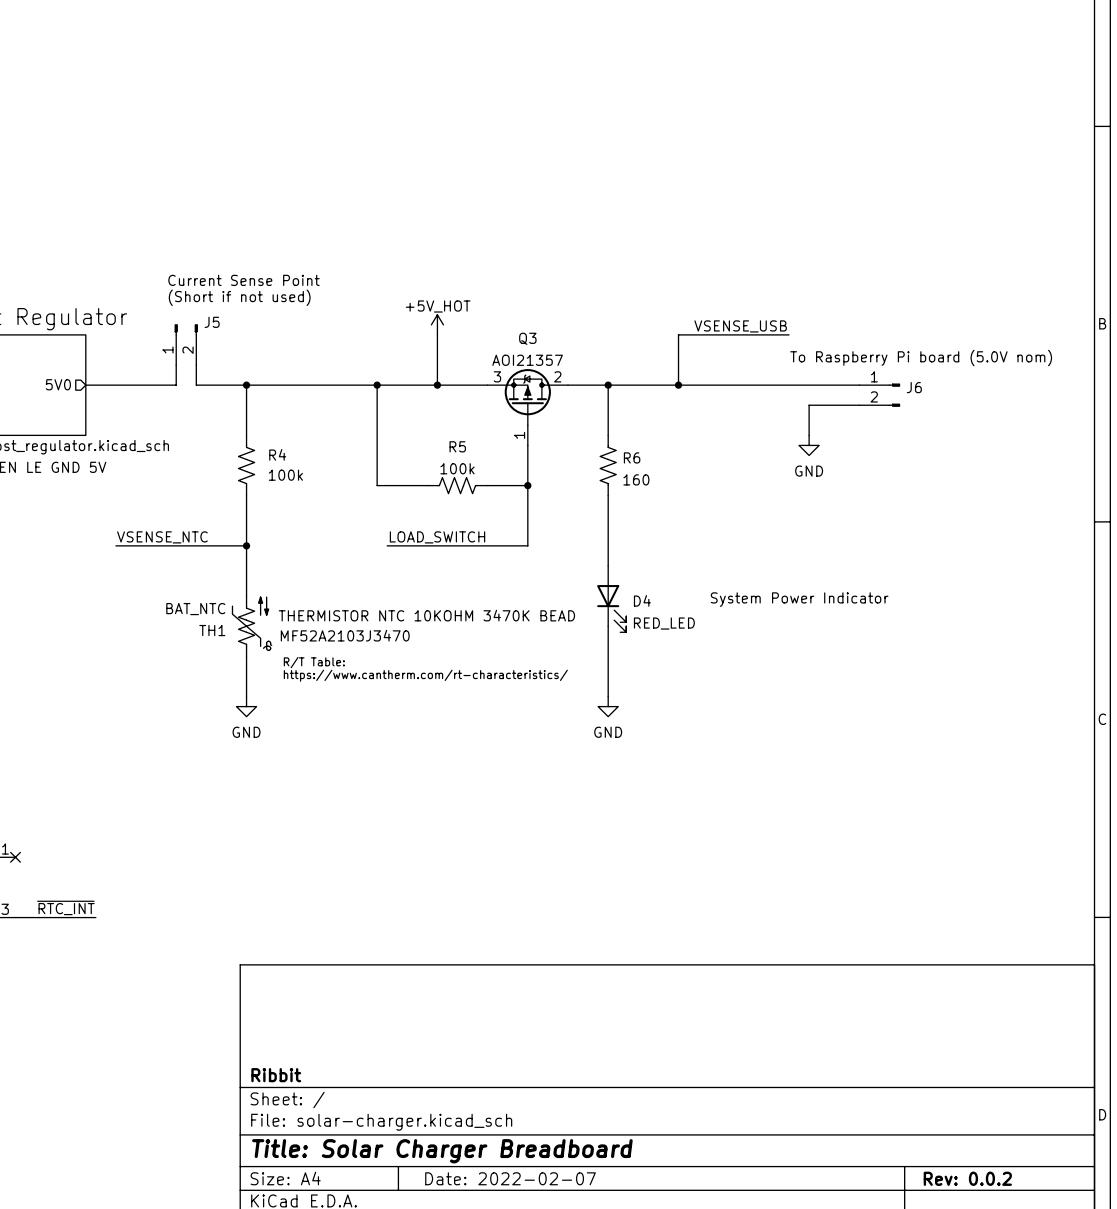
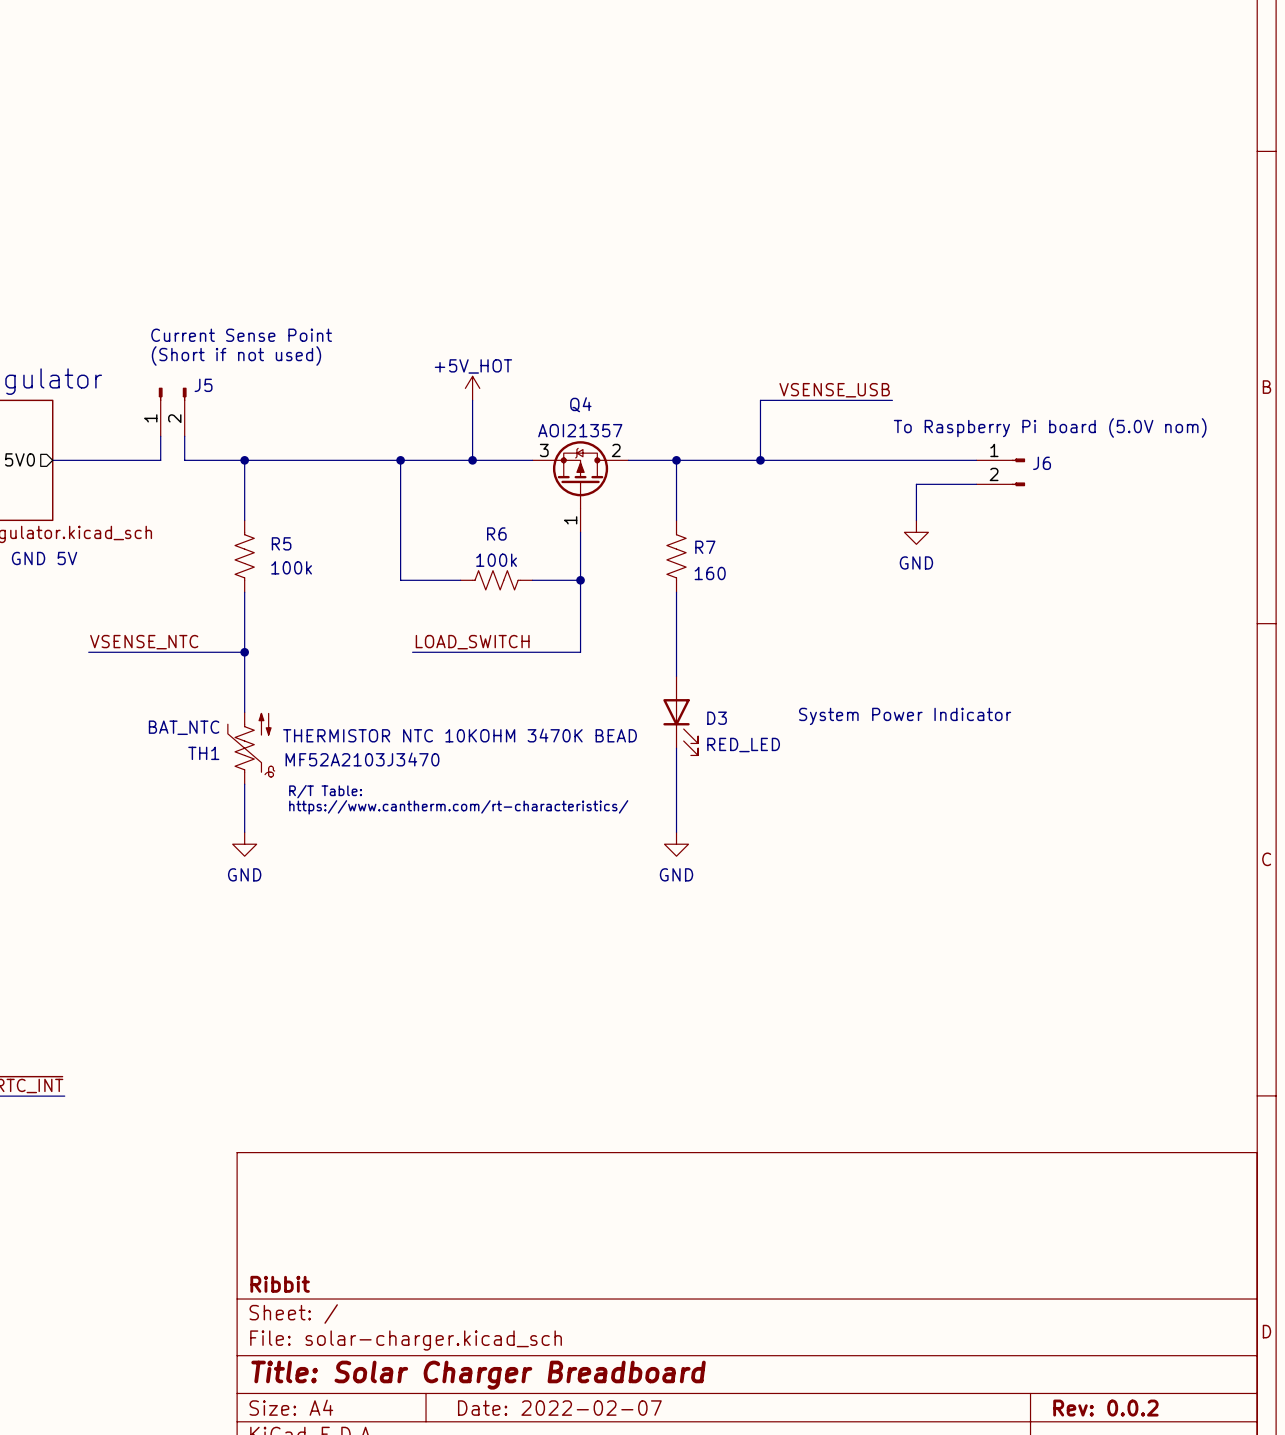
Q3 name: Q3 (527, 338) -> Q4 (580, 404)
R5 name: R5 (457, 446) -> R6 (496, 533)
R4 name: R4 (277, 454) -> R5 (281, 543)
R6 name: R6 (632, 457) -> R7 (705, 547)
D4 name: D4 (642, 600) -> D3 (717, 718)

